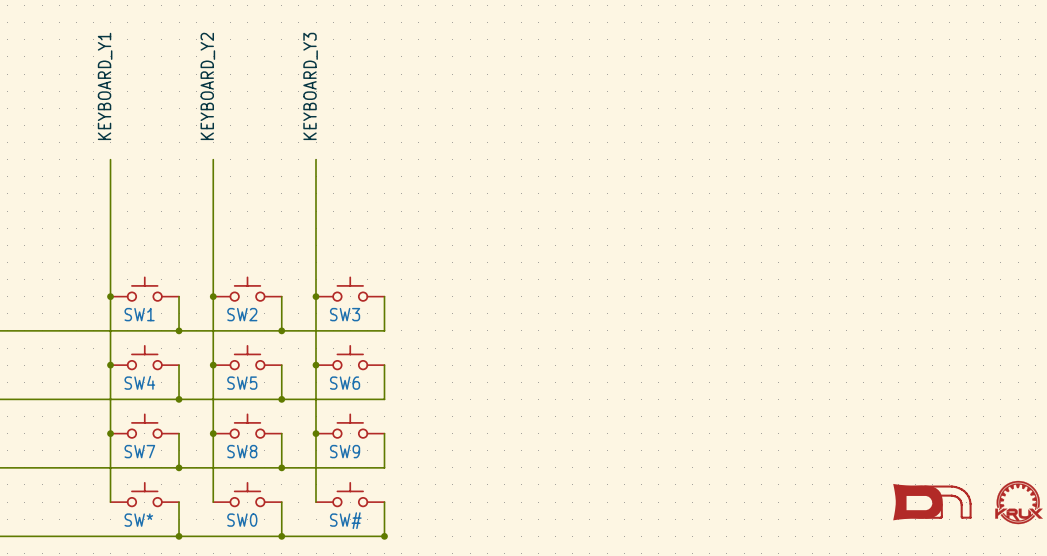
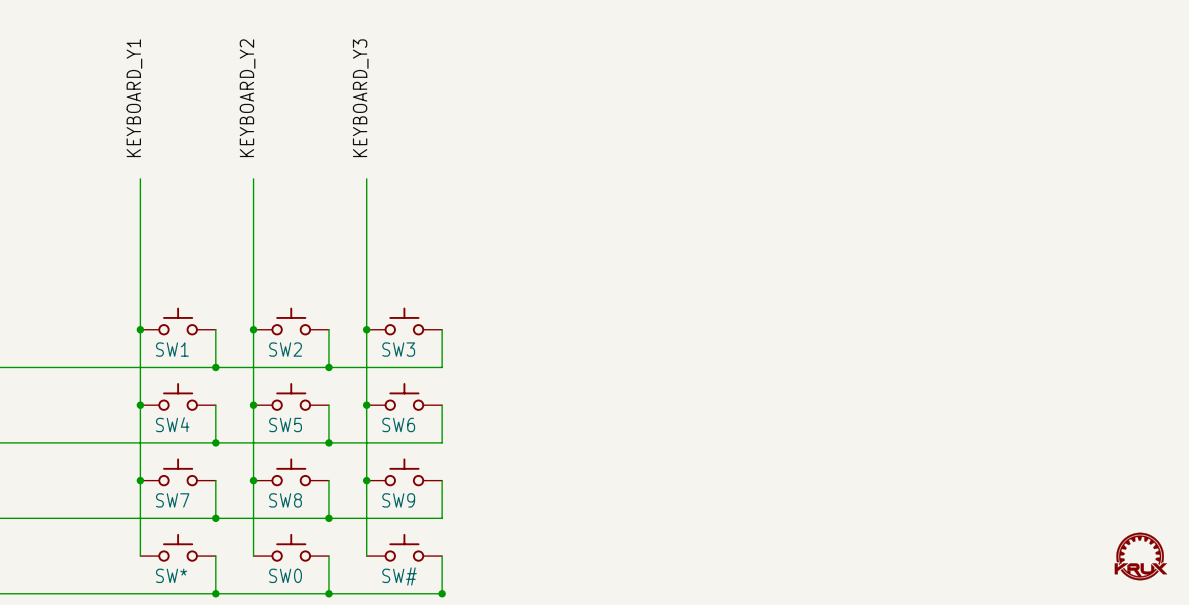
part: (932, 502) -> none

